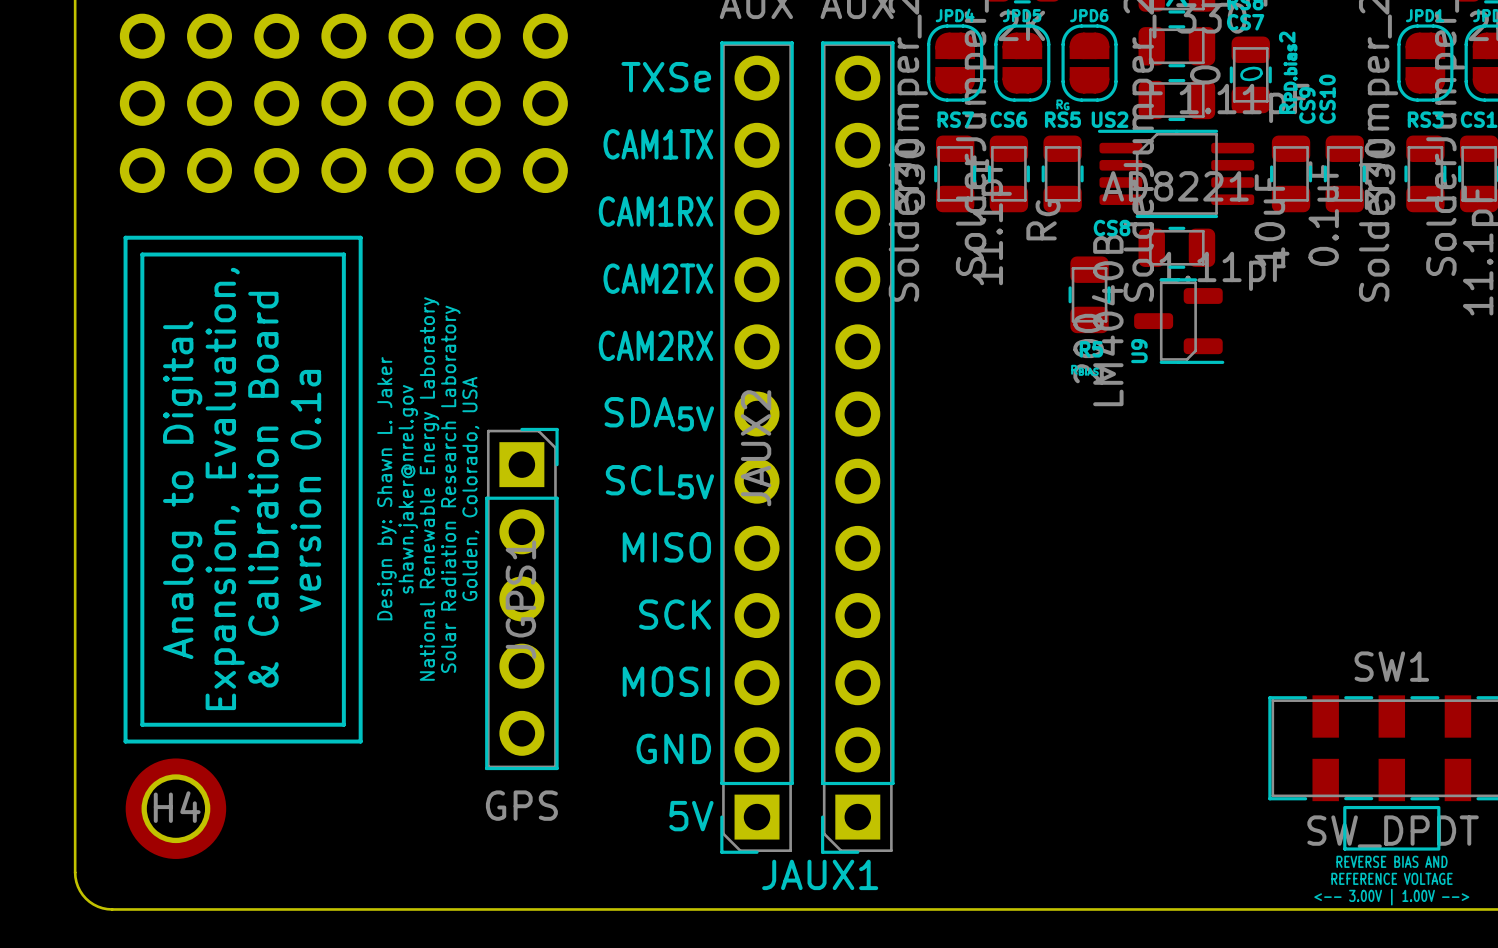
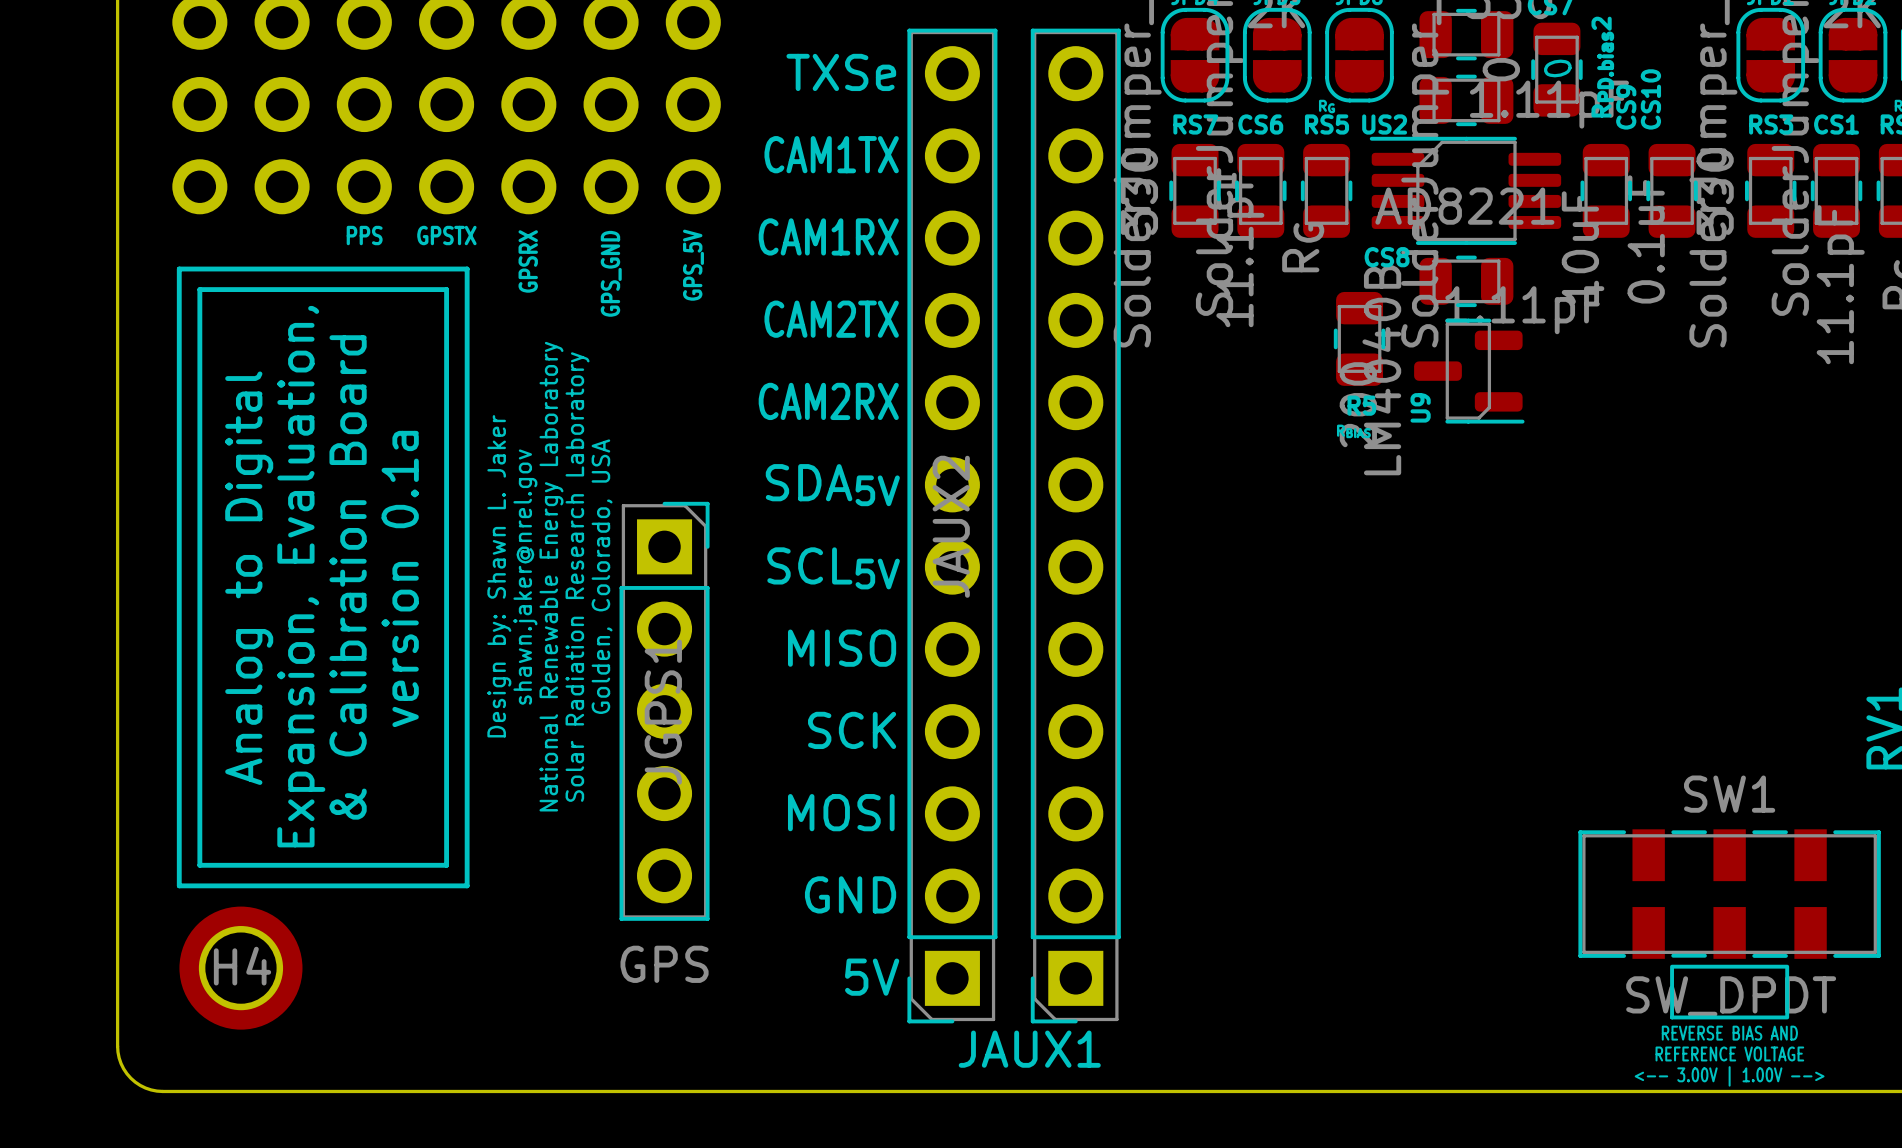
text: none -> PPS (364, 235)
text: none -> GPSTX (446, 235)
text: none -> GPSRX (528, 261)
text: none -> GPS_5V (693, 265)
text: none -> GPS_GND (611, 273)

